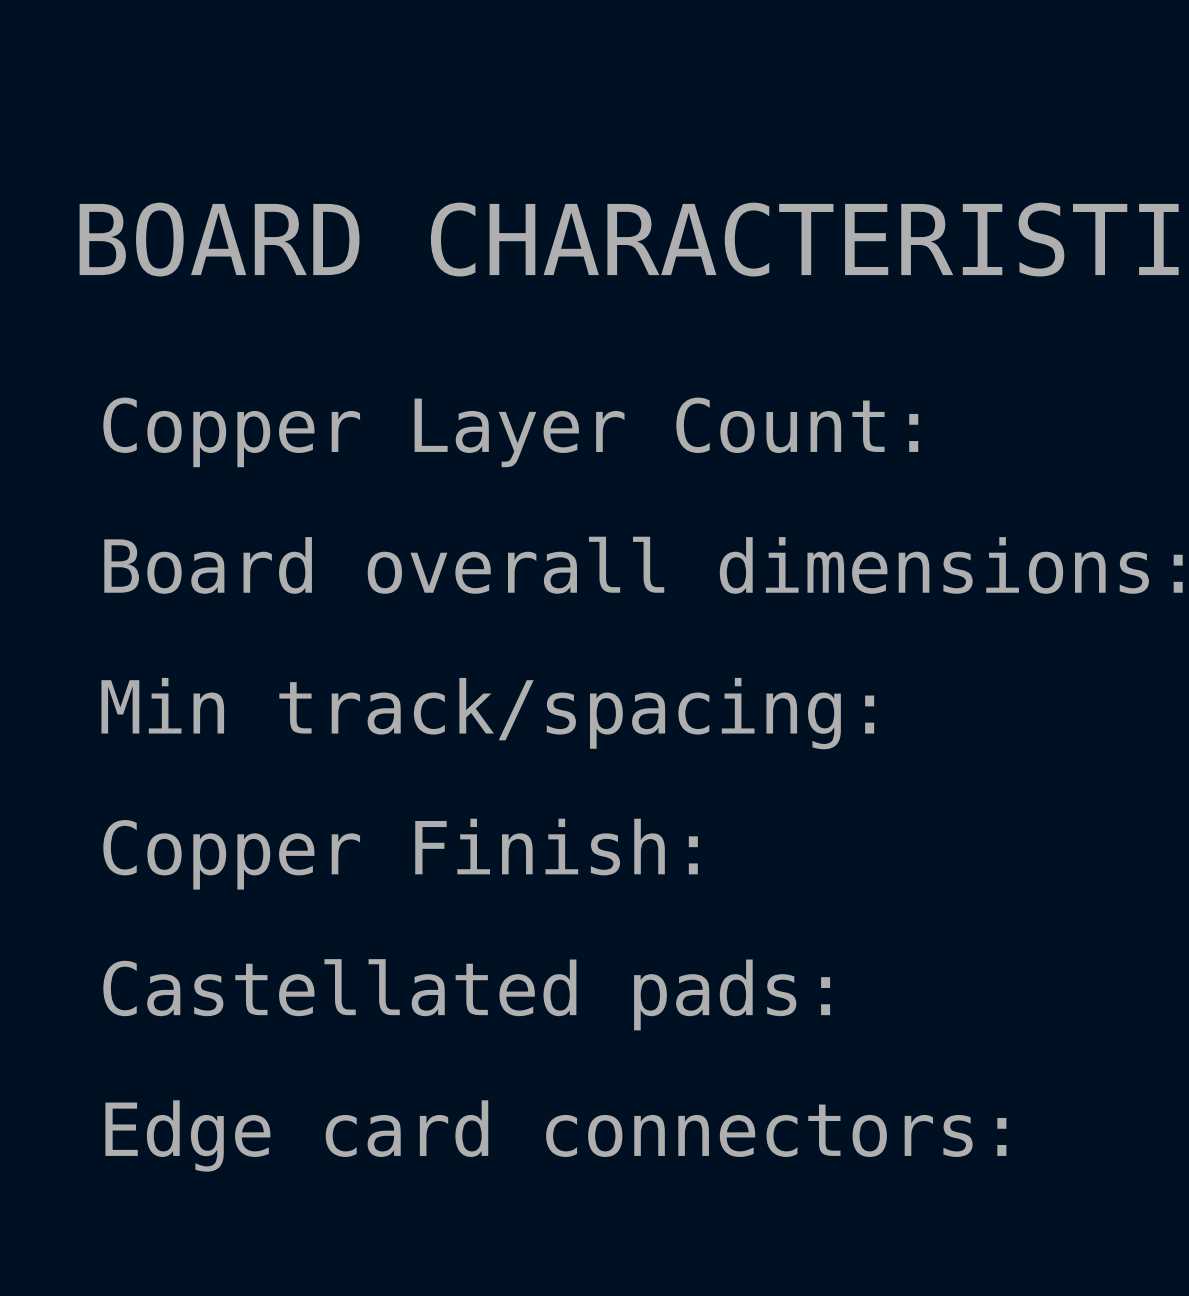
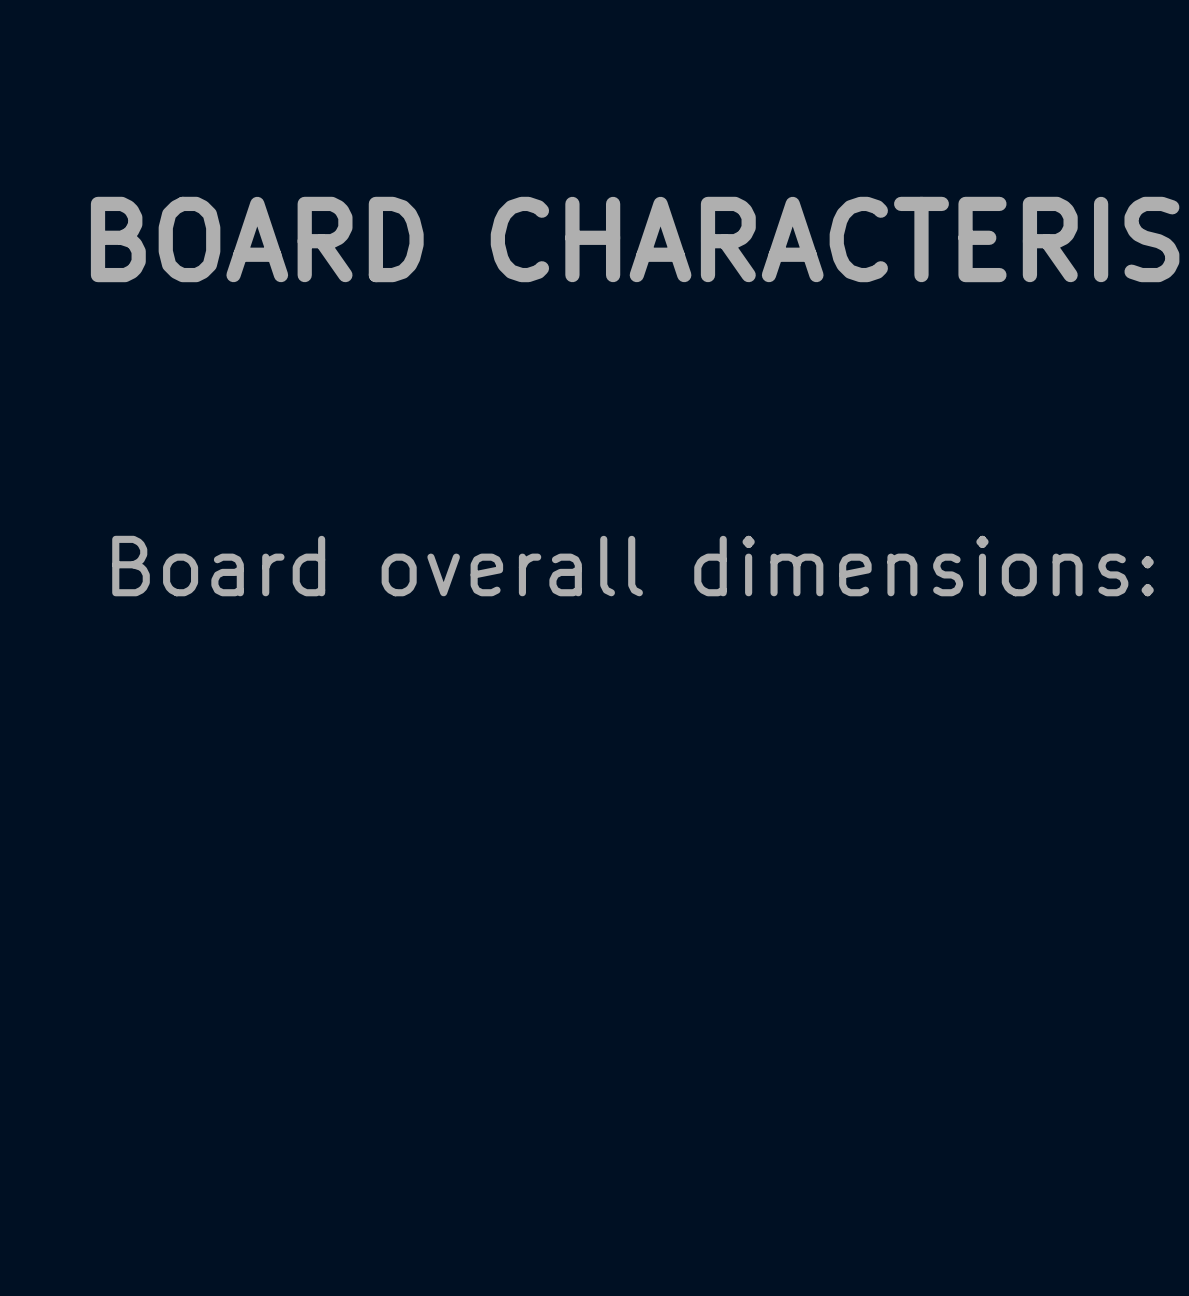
text: Copper Layer Count: (510, 432) -> none
text: Min track/spacing: (487, 713) -> none
text: Copper Finish: (400, 854) -> none
text: Castellated pads: (466, 994) -> none
text: Edge card connectors: (555, 1135) -> none

